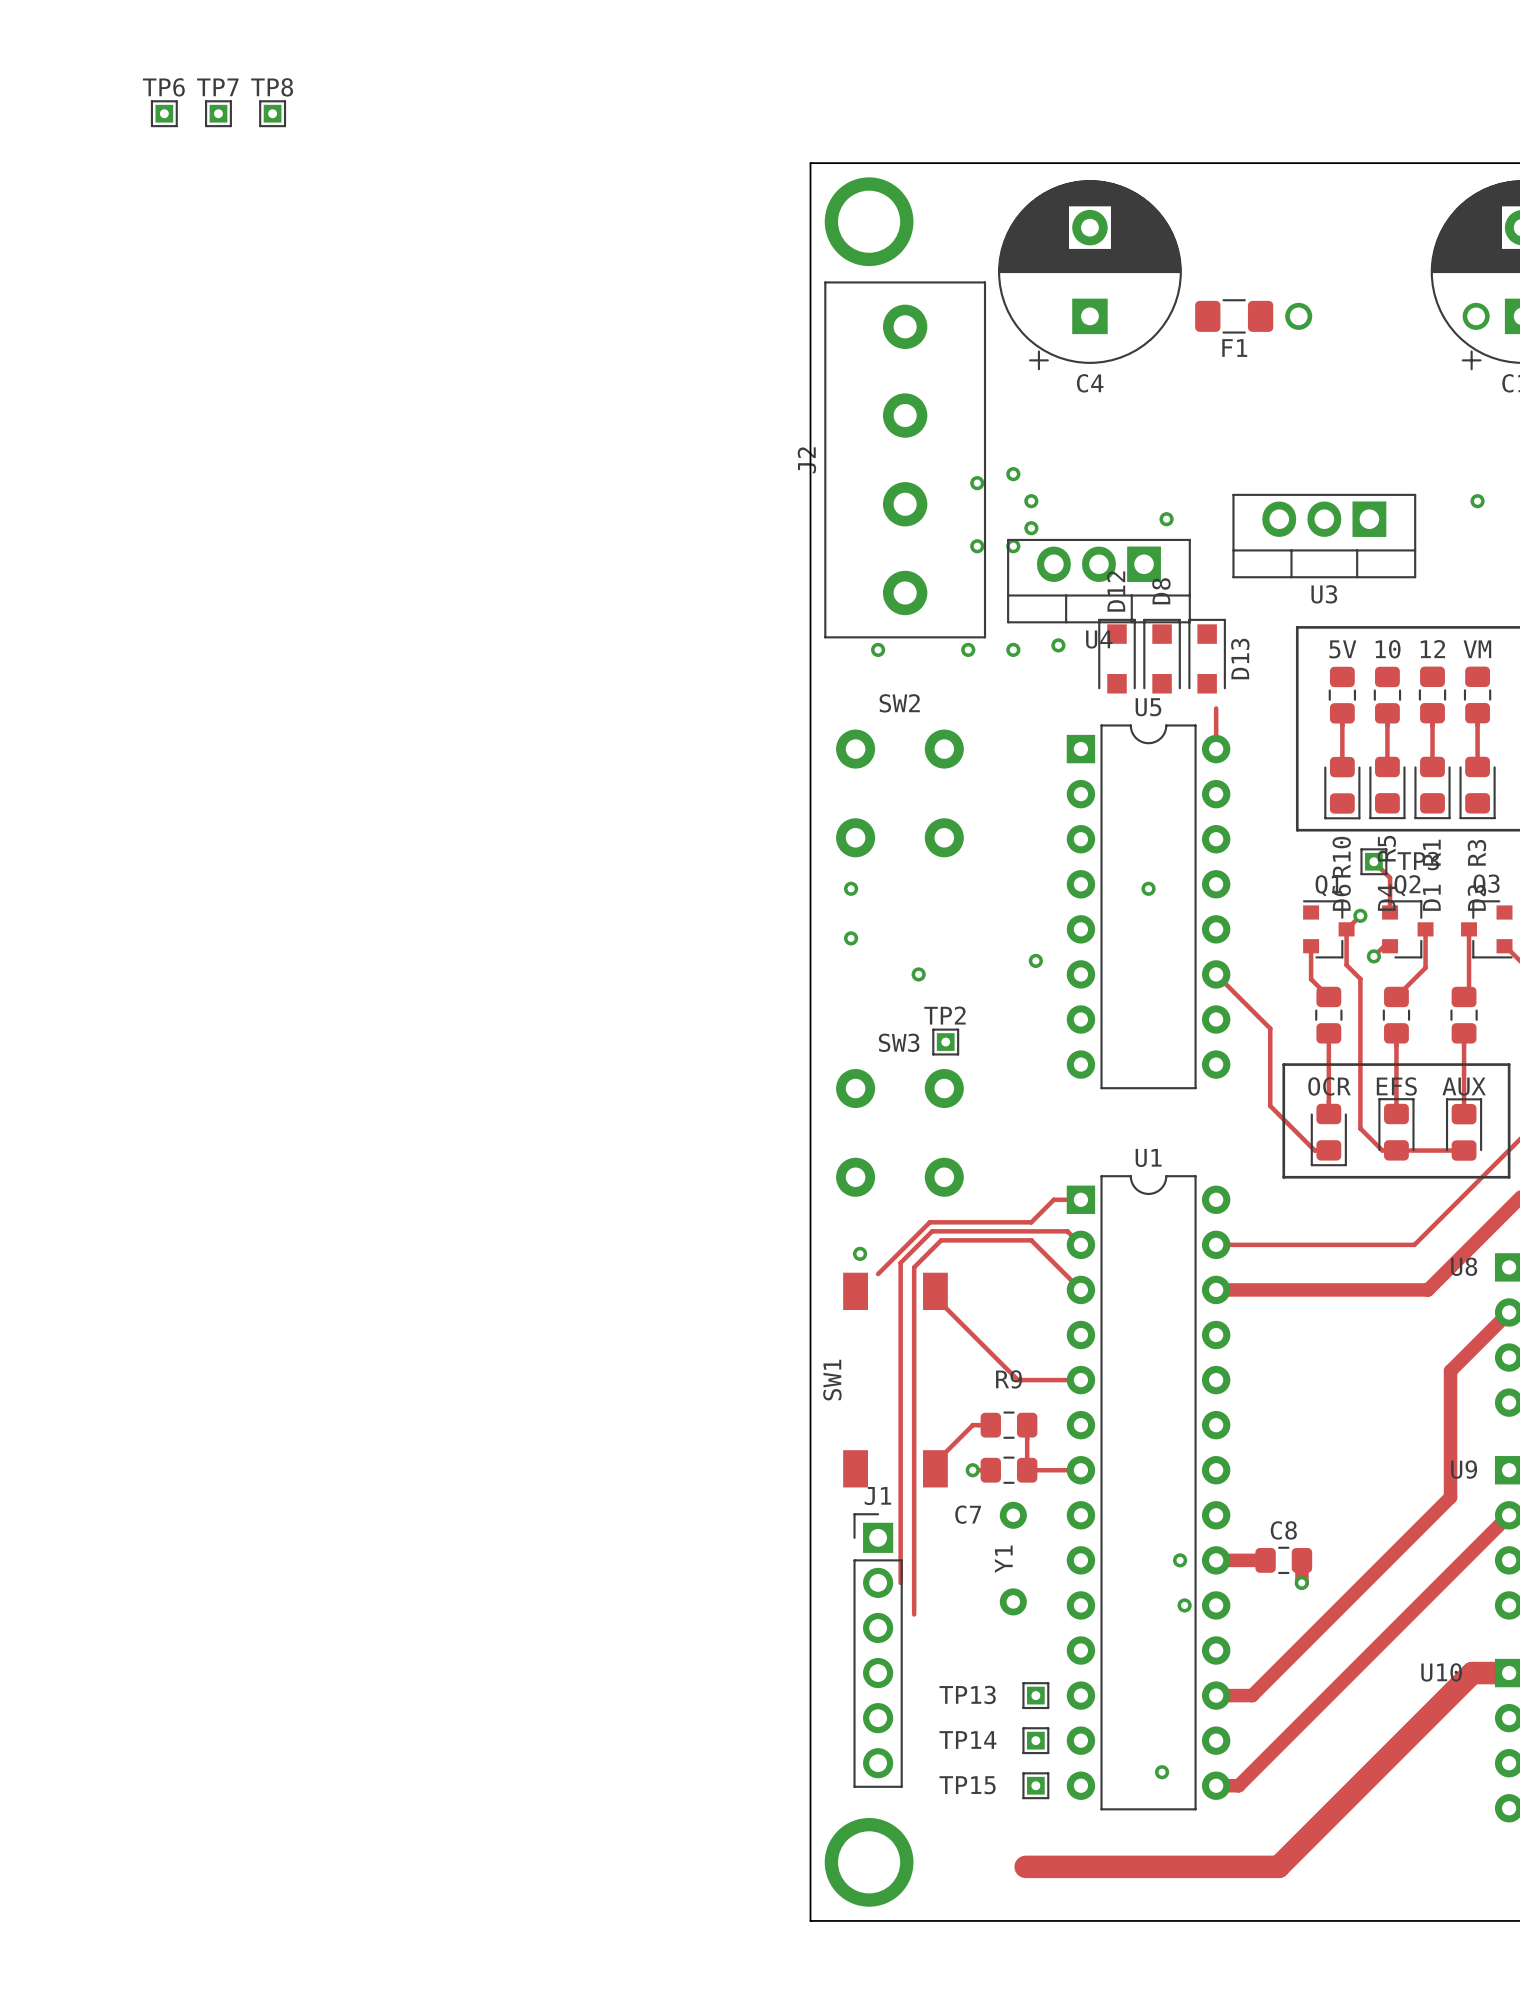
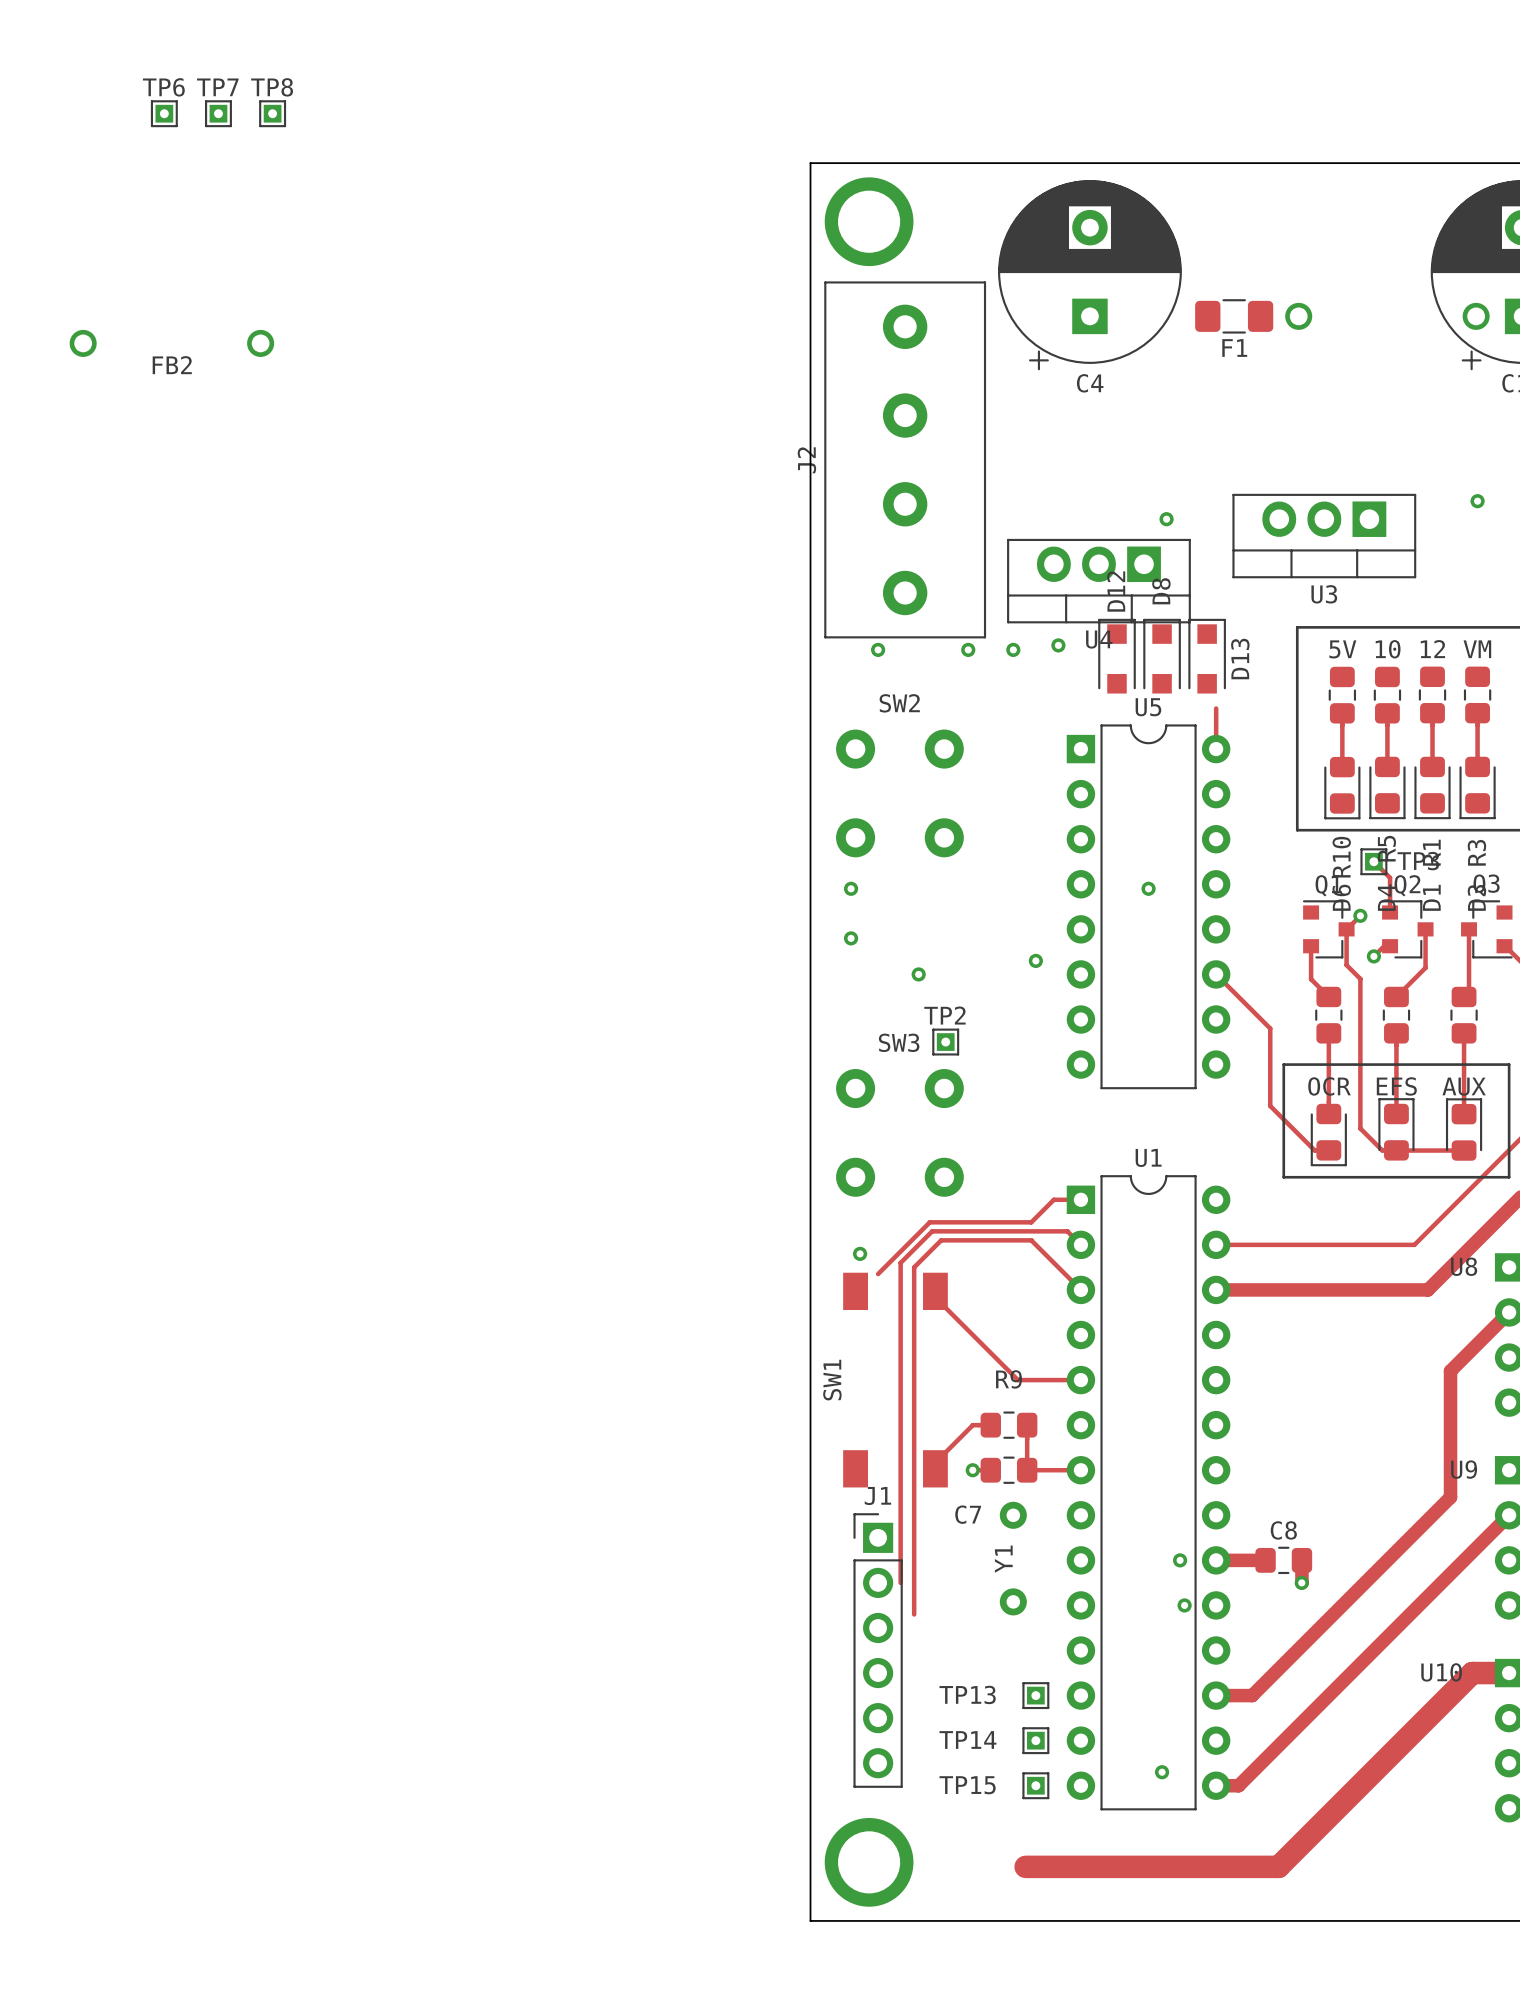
FB2: none -> (171, 343)
via: (1013, 474) -> none
via: (977, 483) -> none
via: (1031, 501) -> none
via: (1031, 528) -> none
via: (977, 546) -> none
via: (1013, 546) -> none

